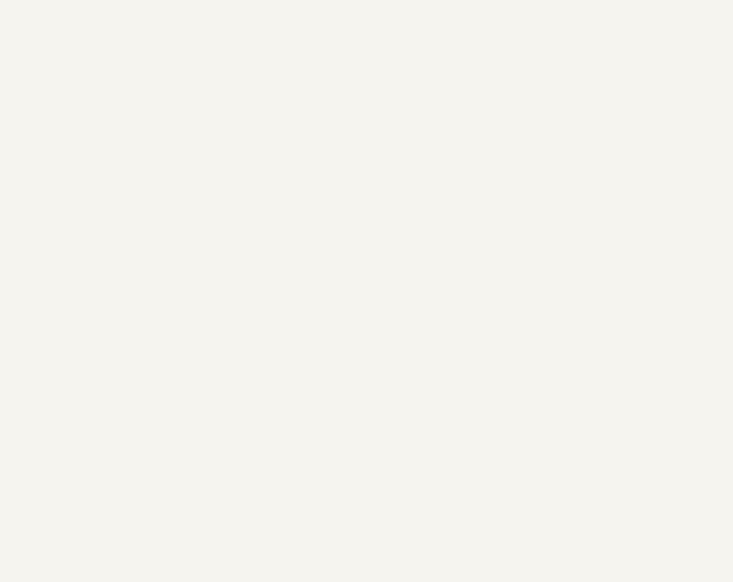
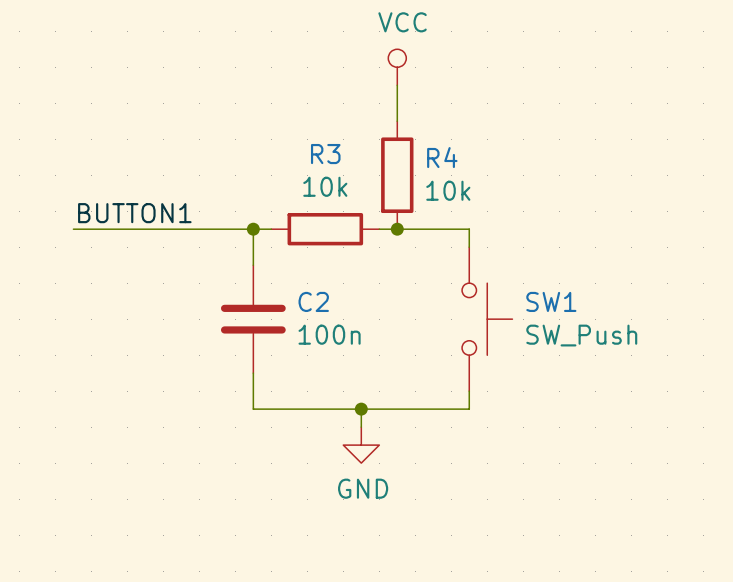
power symbol: none -> VCC (397, 67)
wire: none -> (397, 85) (397, 121)
R4: none -> 10k (397, 175)
label: none -> BUTTON1 (134, 213)
wire: none -> (73, 229) (271, 229)
wire: none -> (253, 229) (253, 265)
junction: none -> (253, 229)
R3: none -> 10k (325, 229)
wire: none -> (379, 229) (469, 229) (469, 247)
junction: none -> (397, 229)
C2: none -> 100n (253, 319)
SW1: none -> SW_Push (487, 319)
wire: none -> (253, 373) (253, 409) (469, 409) (469, 391)
wire: none -> (361, 409) (361, 427)
junction: none -> (361, 409)
power symbol: none -> GND (361, 445)

